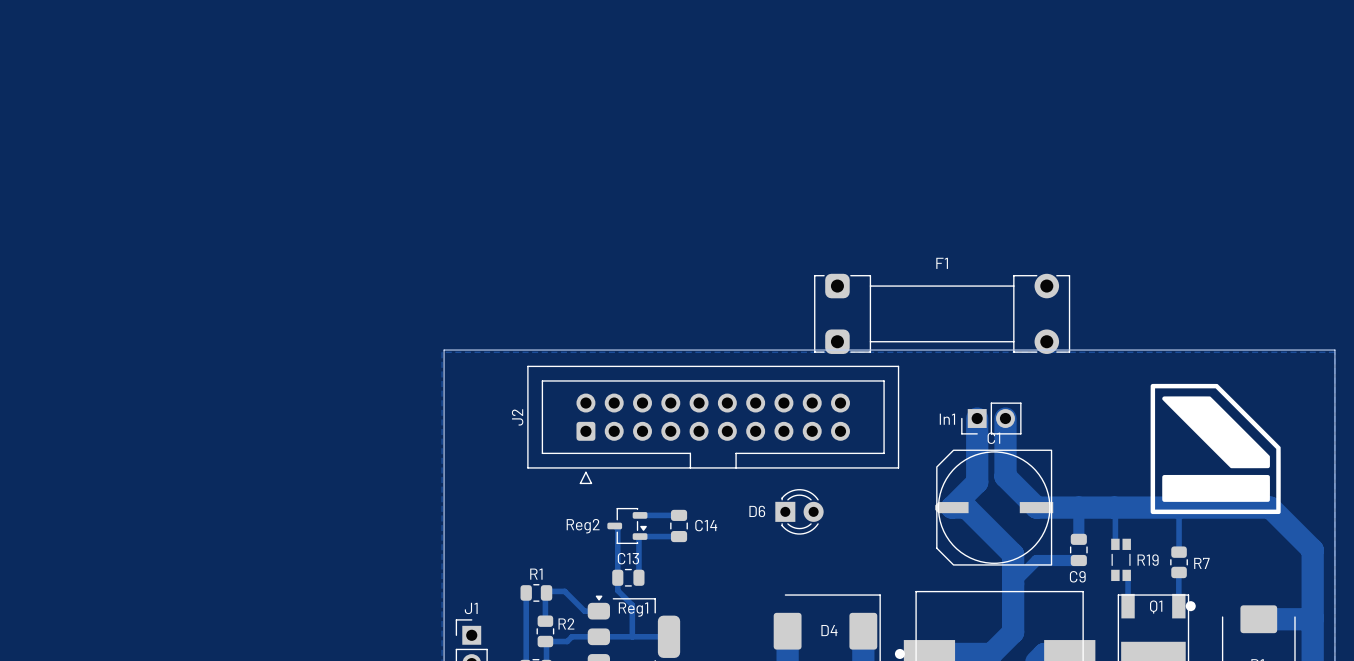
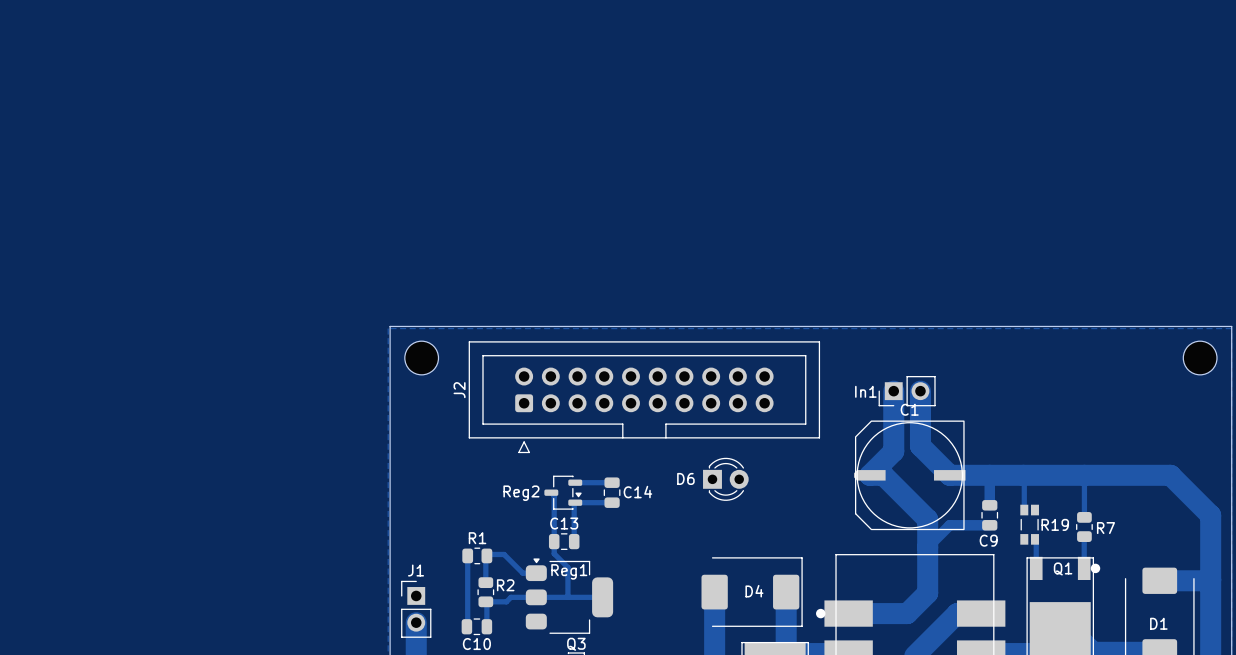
F1: (942, 313) -> none
part: none -> (421, 358)
drawing: [1150, 383, 1281, 515] -> none
part: none -> (1200, 358)

